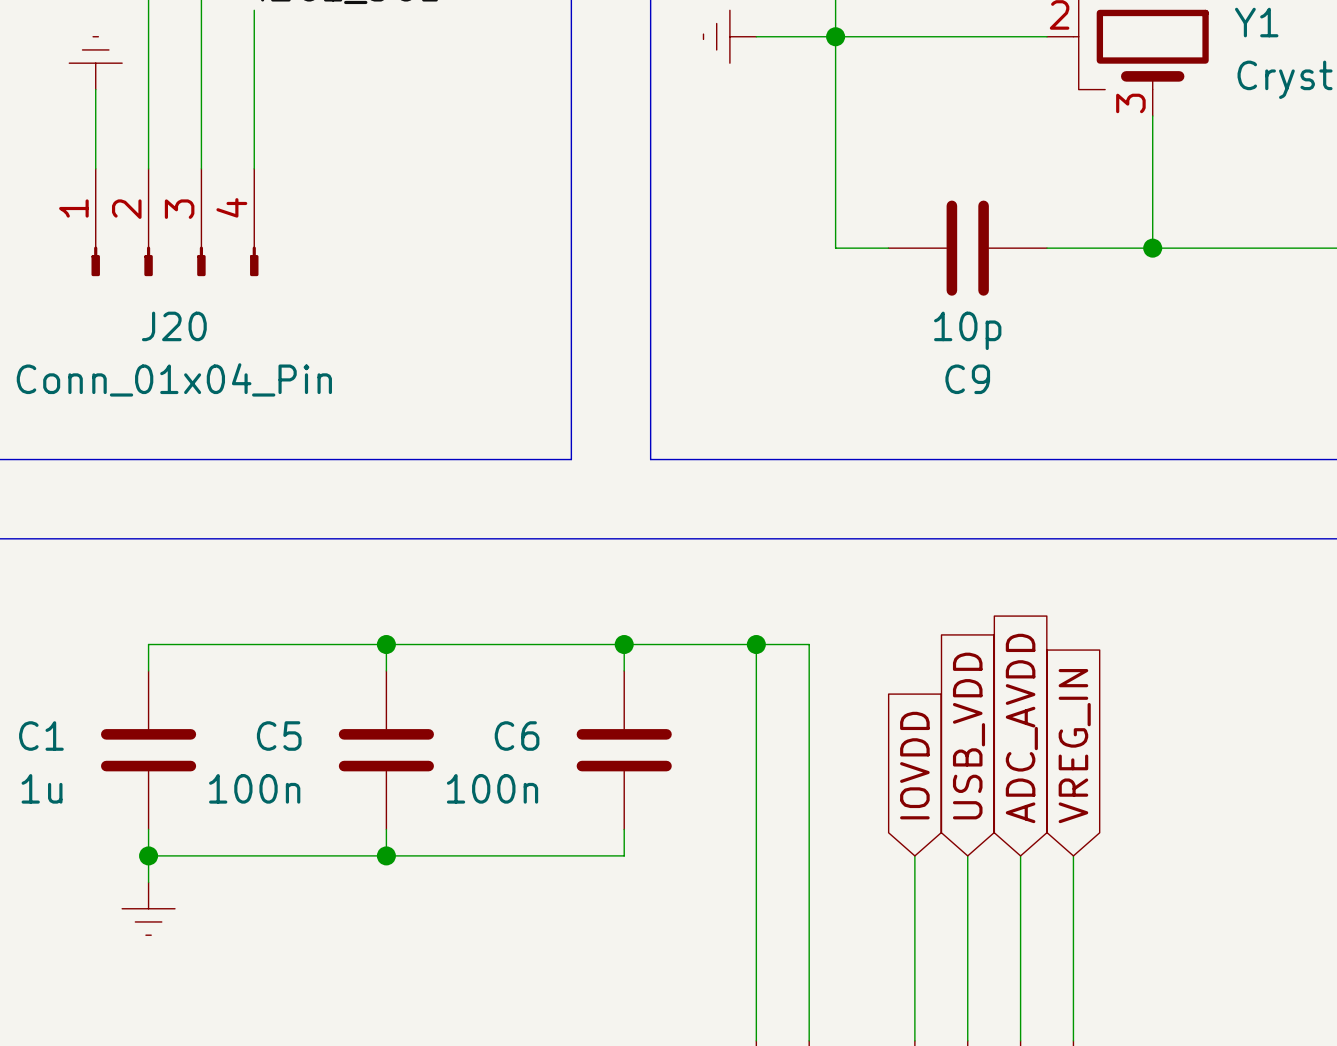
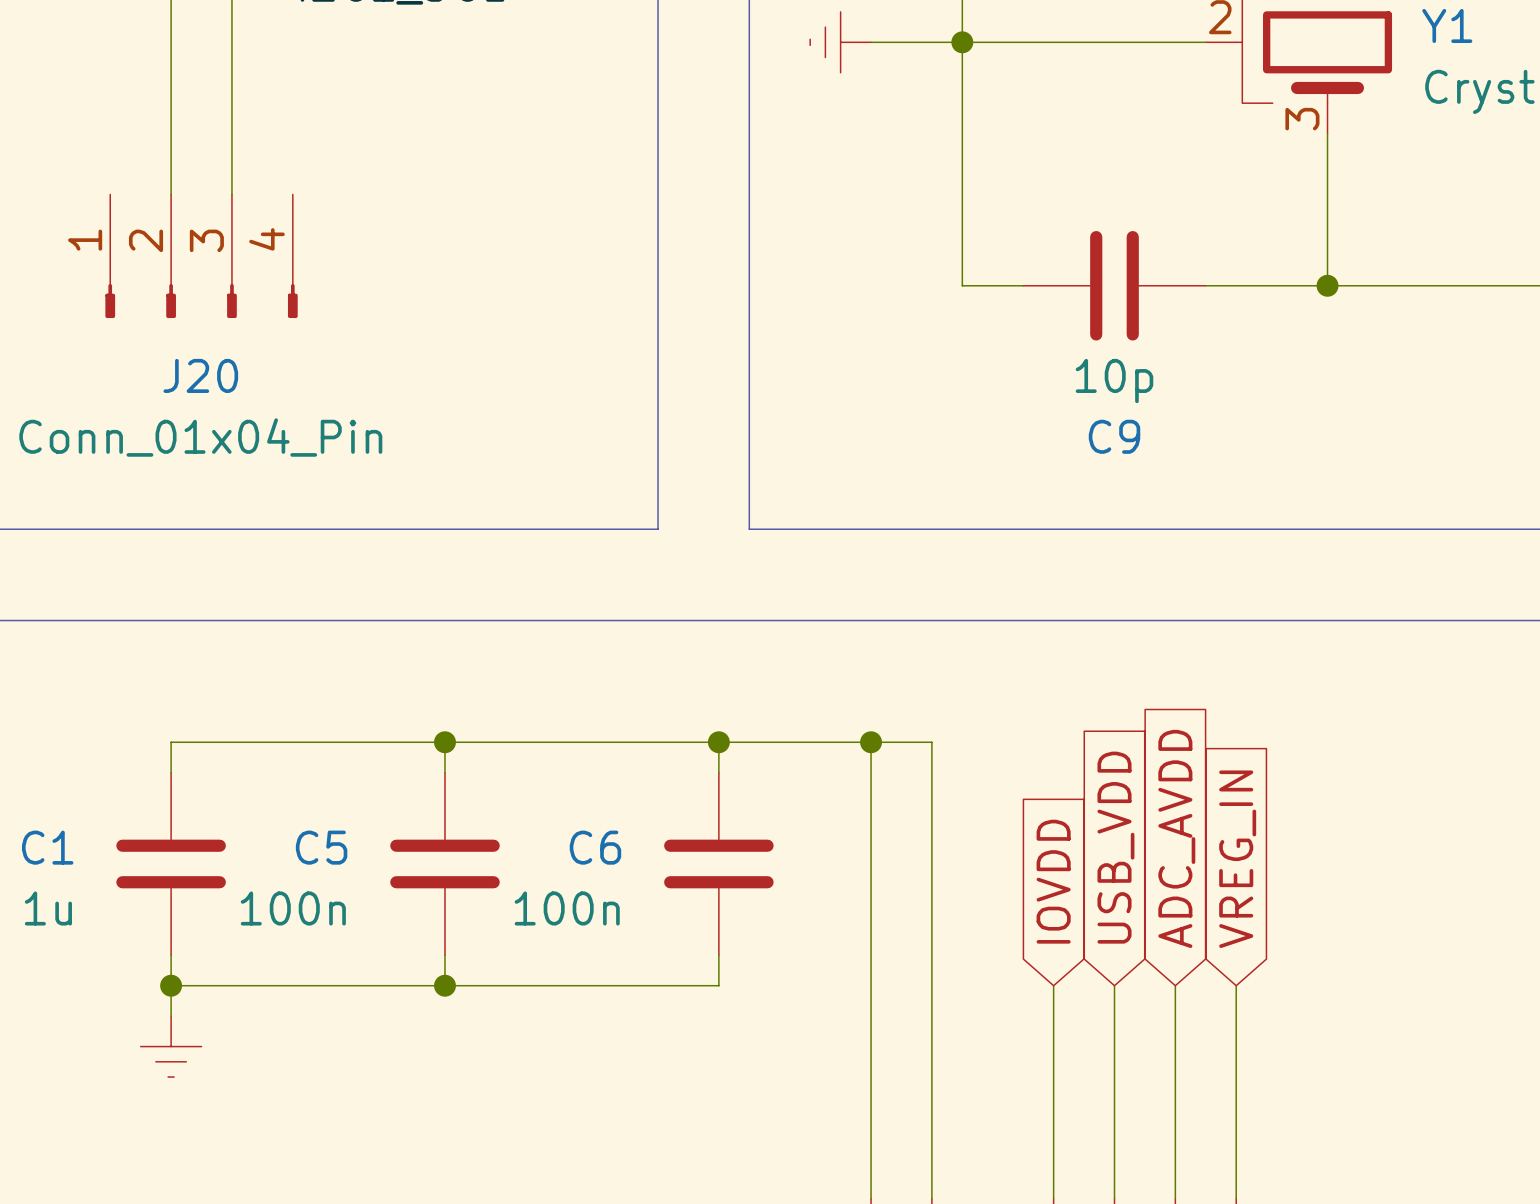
wire: (254, 10) (254, 168) -> none
power symbol: (95, 63) -> none
wire: (95, 89) (95, 168) -> none

